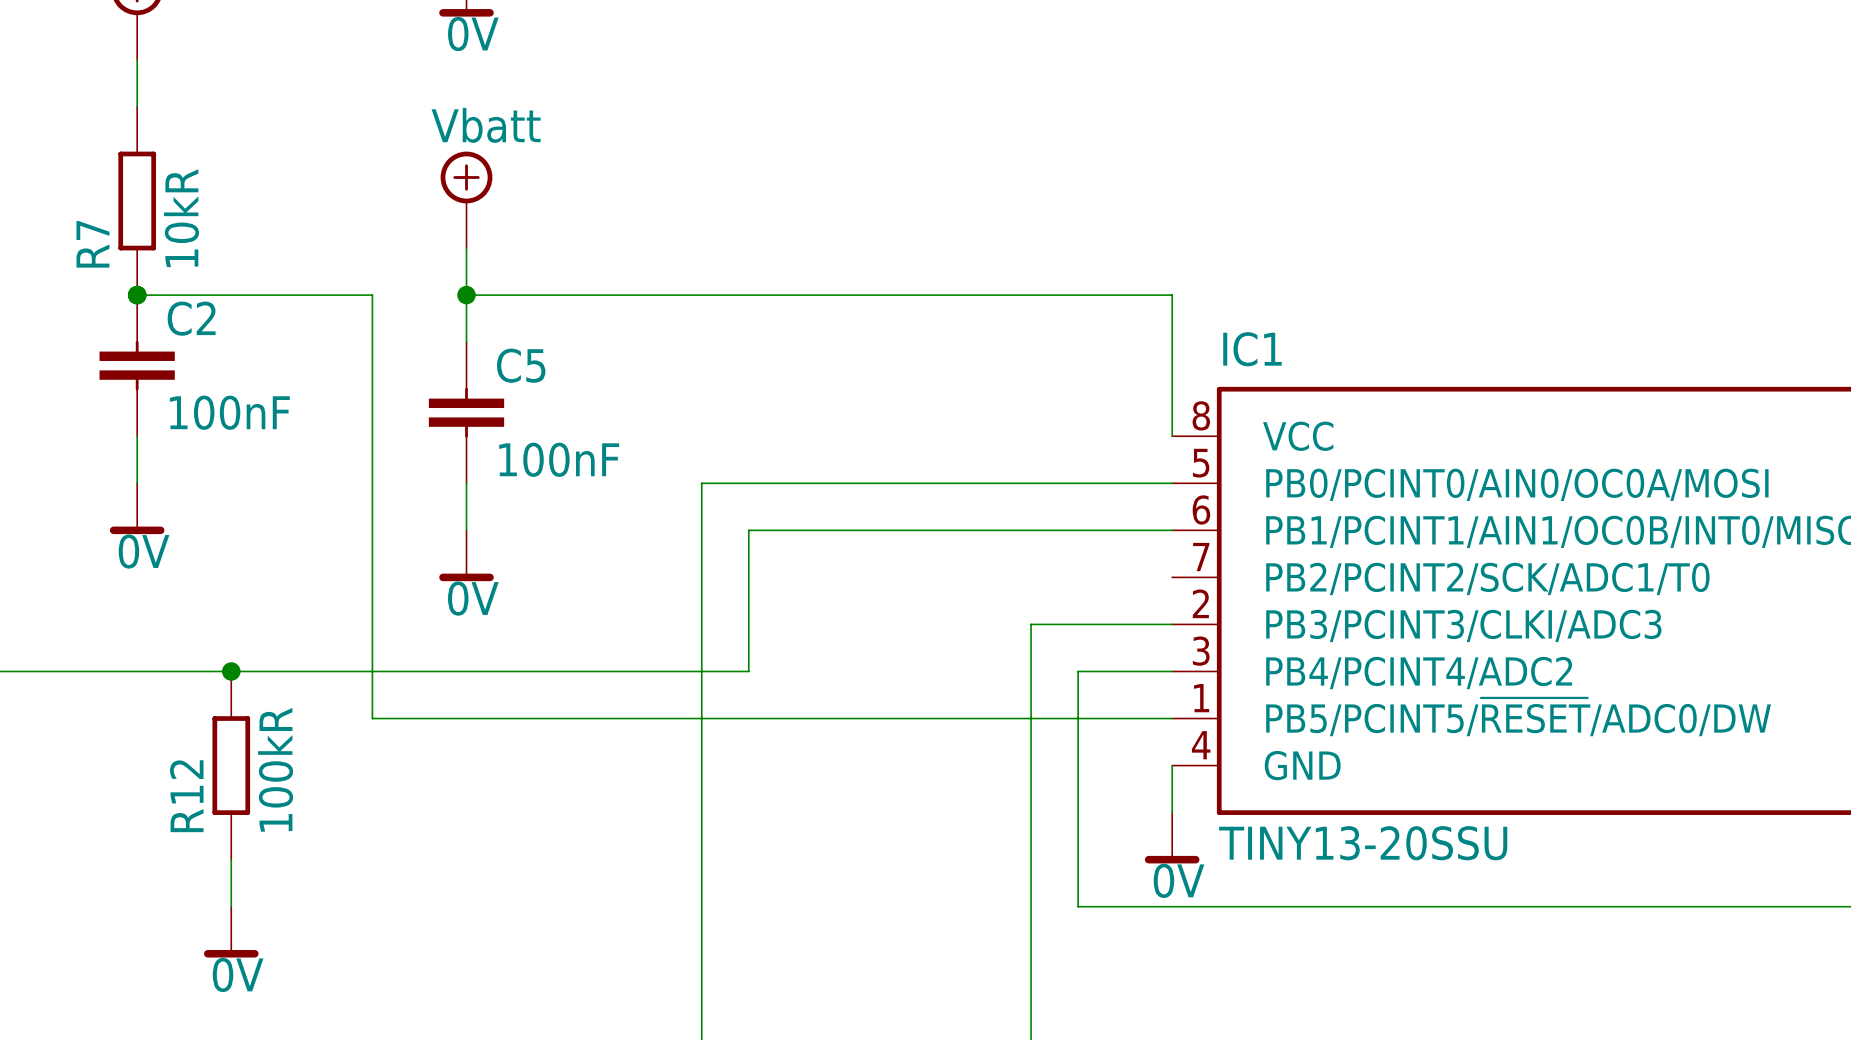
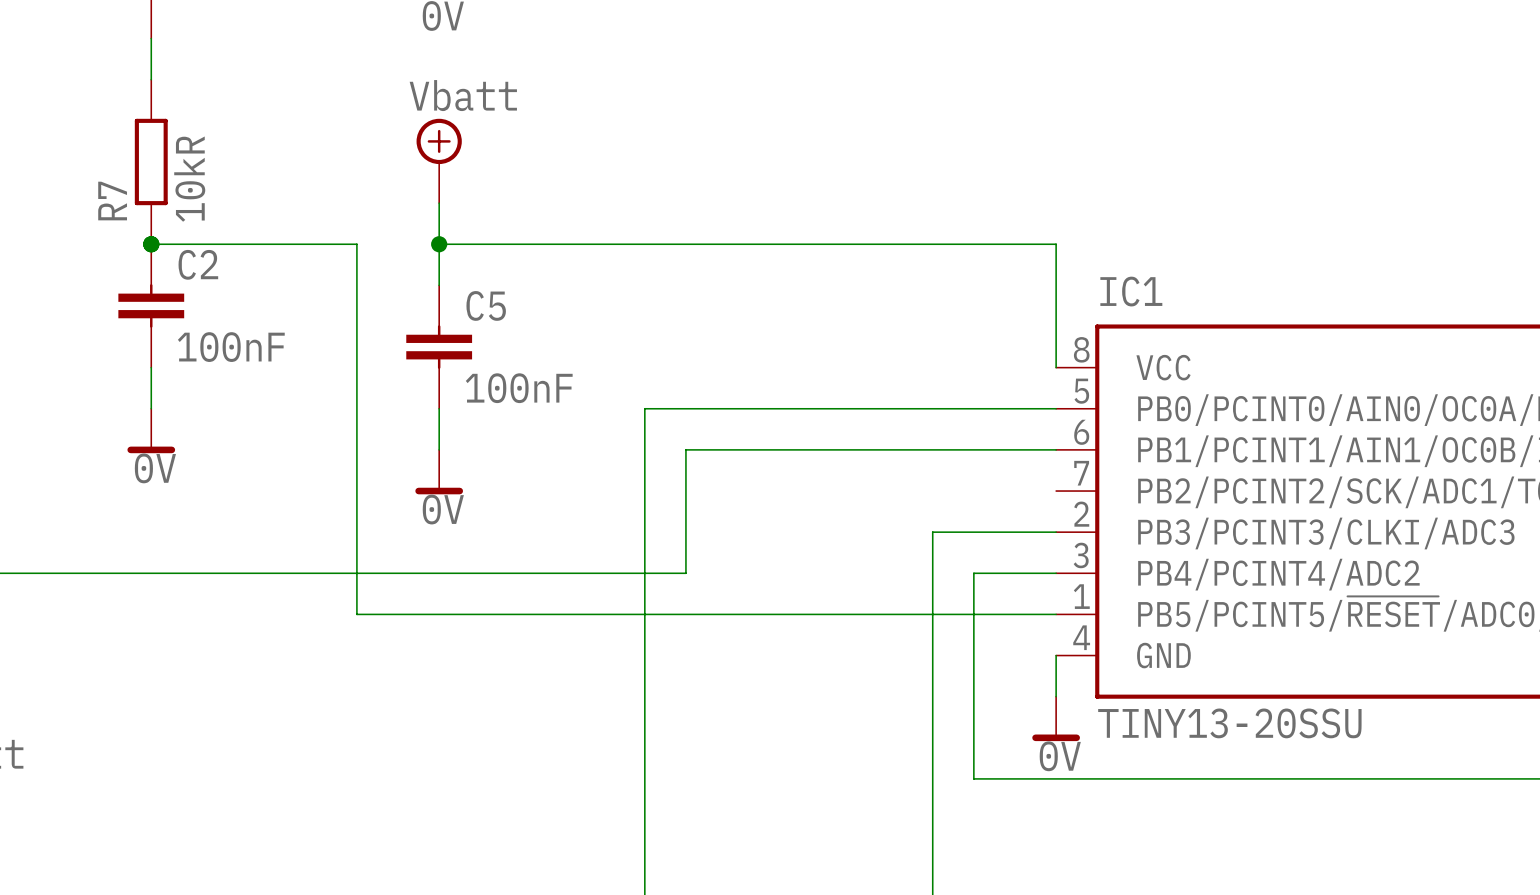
junction: (231, 671) -> none
R12: 100kR (231, 765) -> none
wire: (231, 859) (231, 906) -> none
power symbol: 0V (231, 932) -> none

